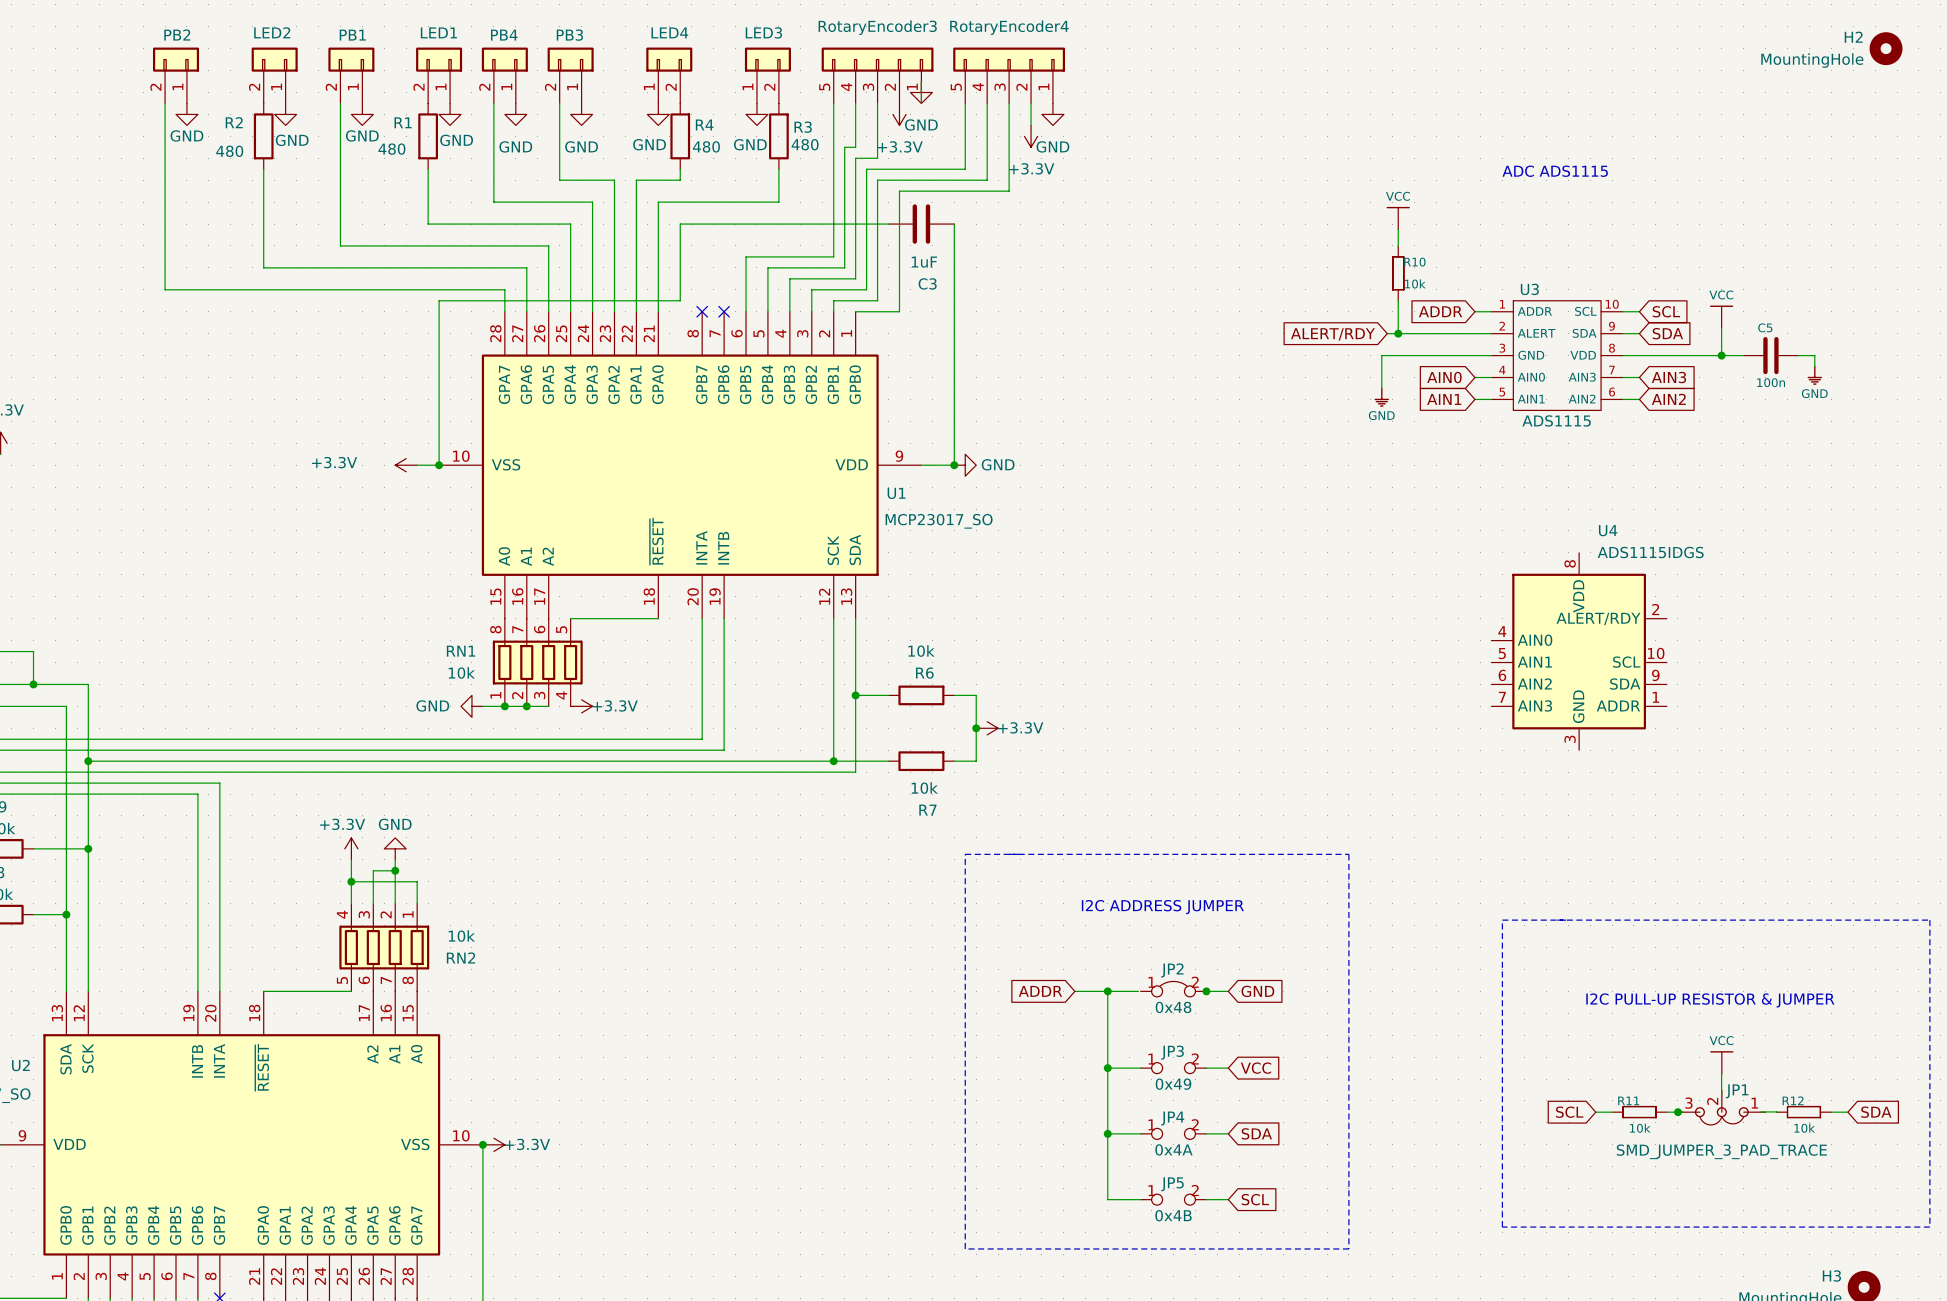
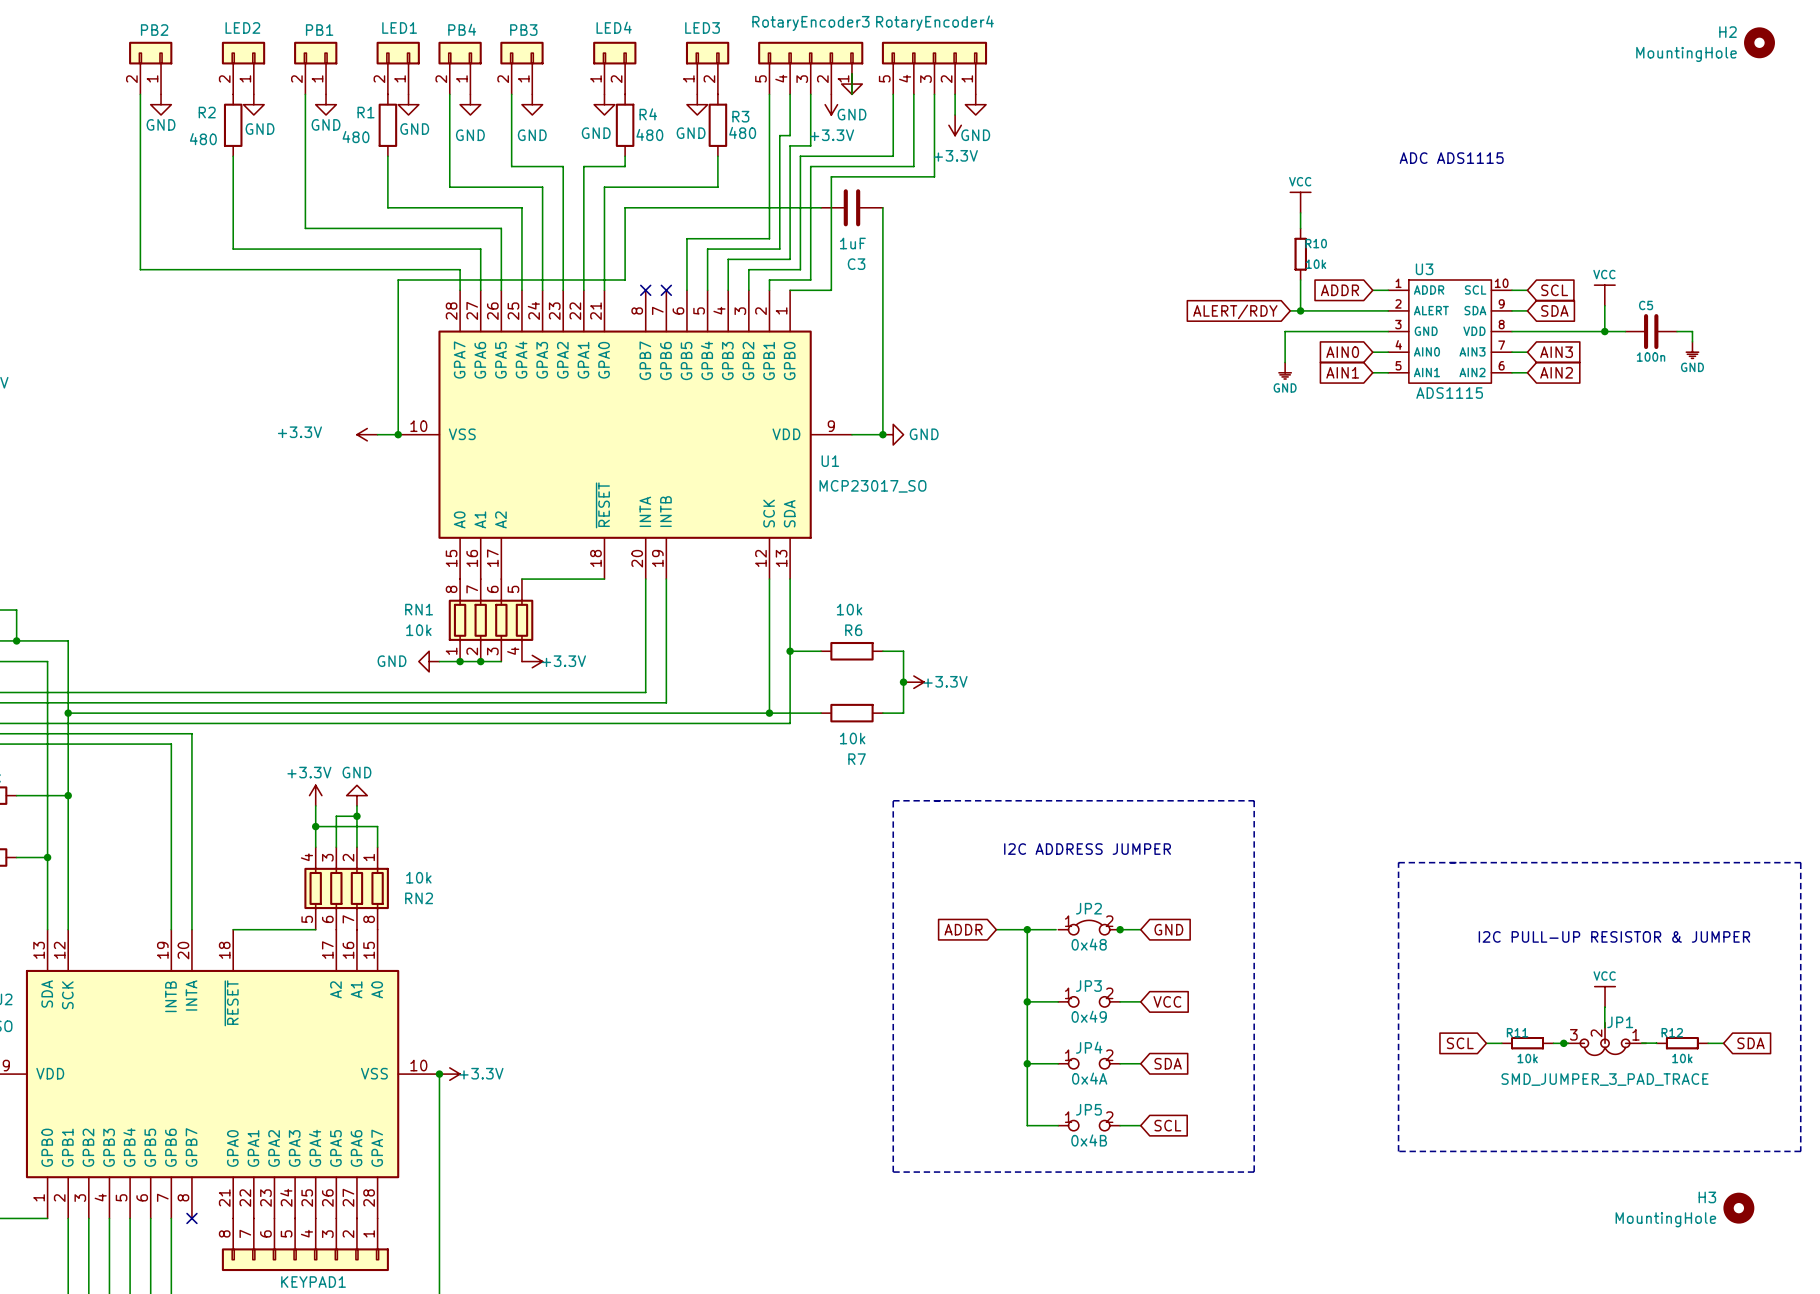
U4: ADS1115IDGS (1579, 651) -> none

